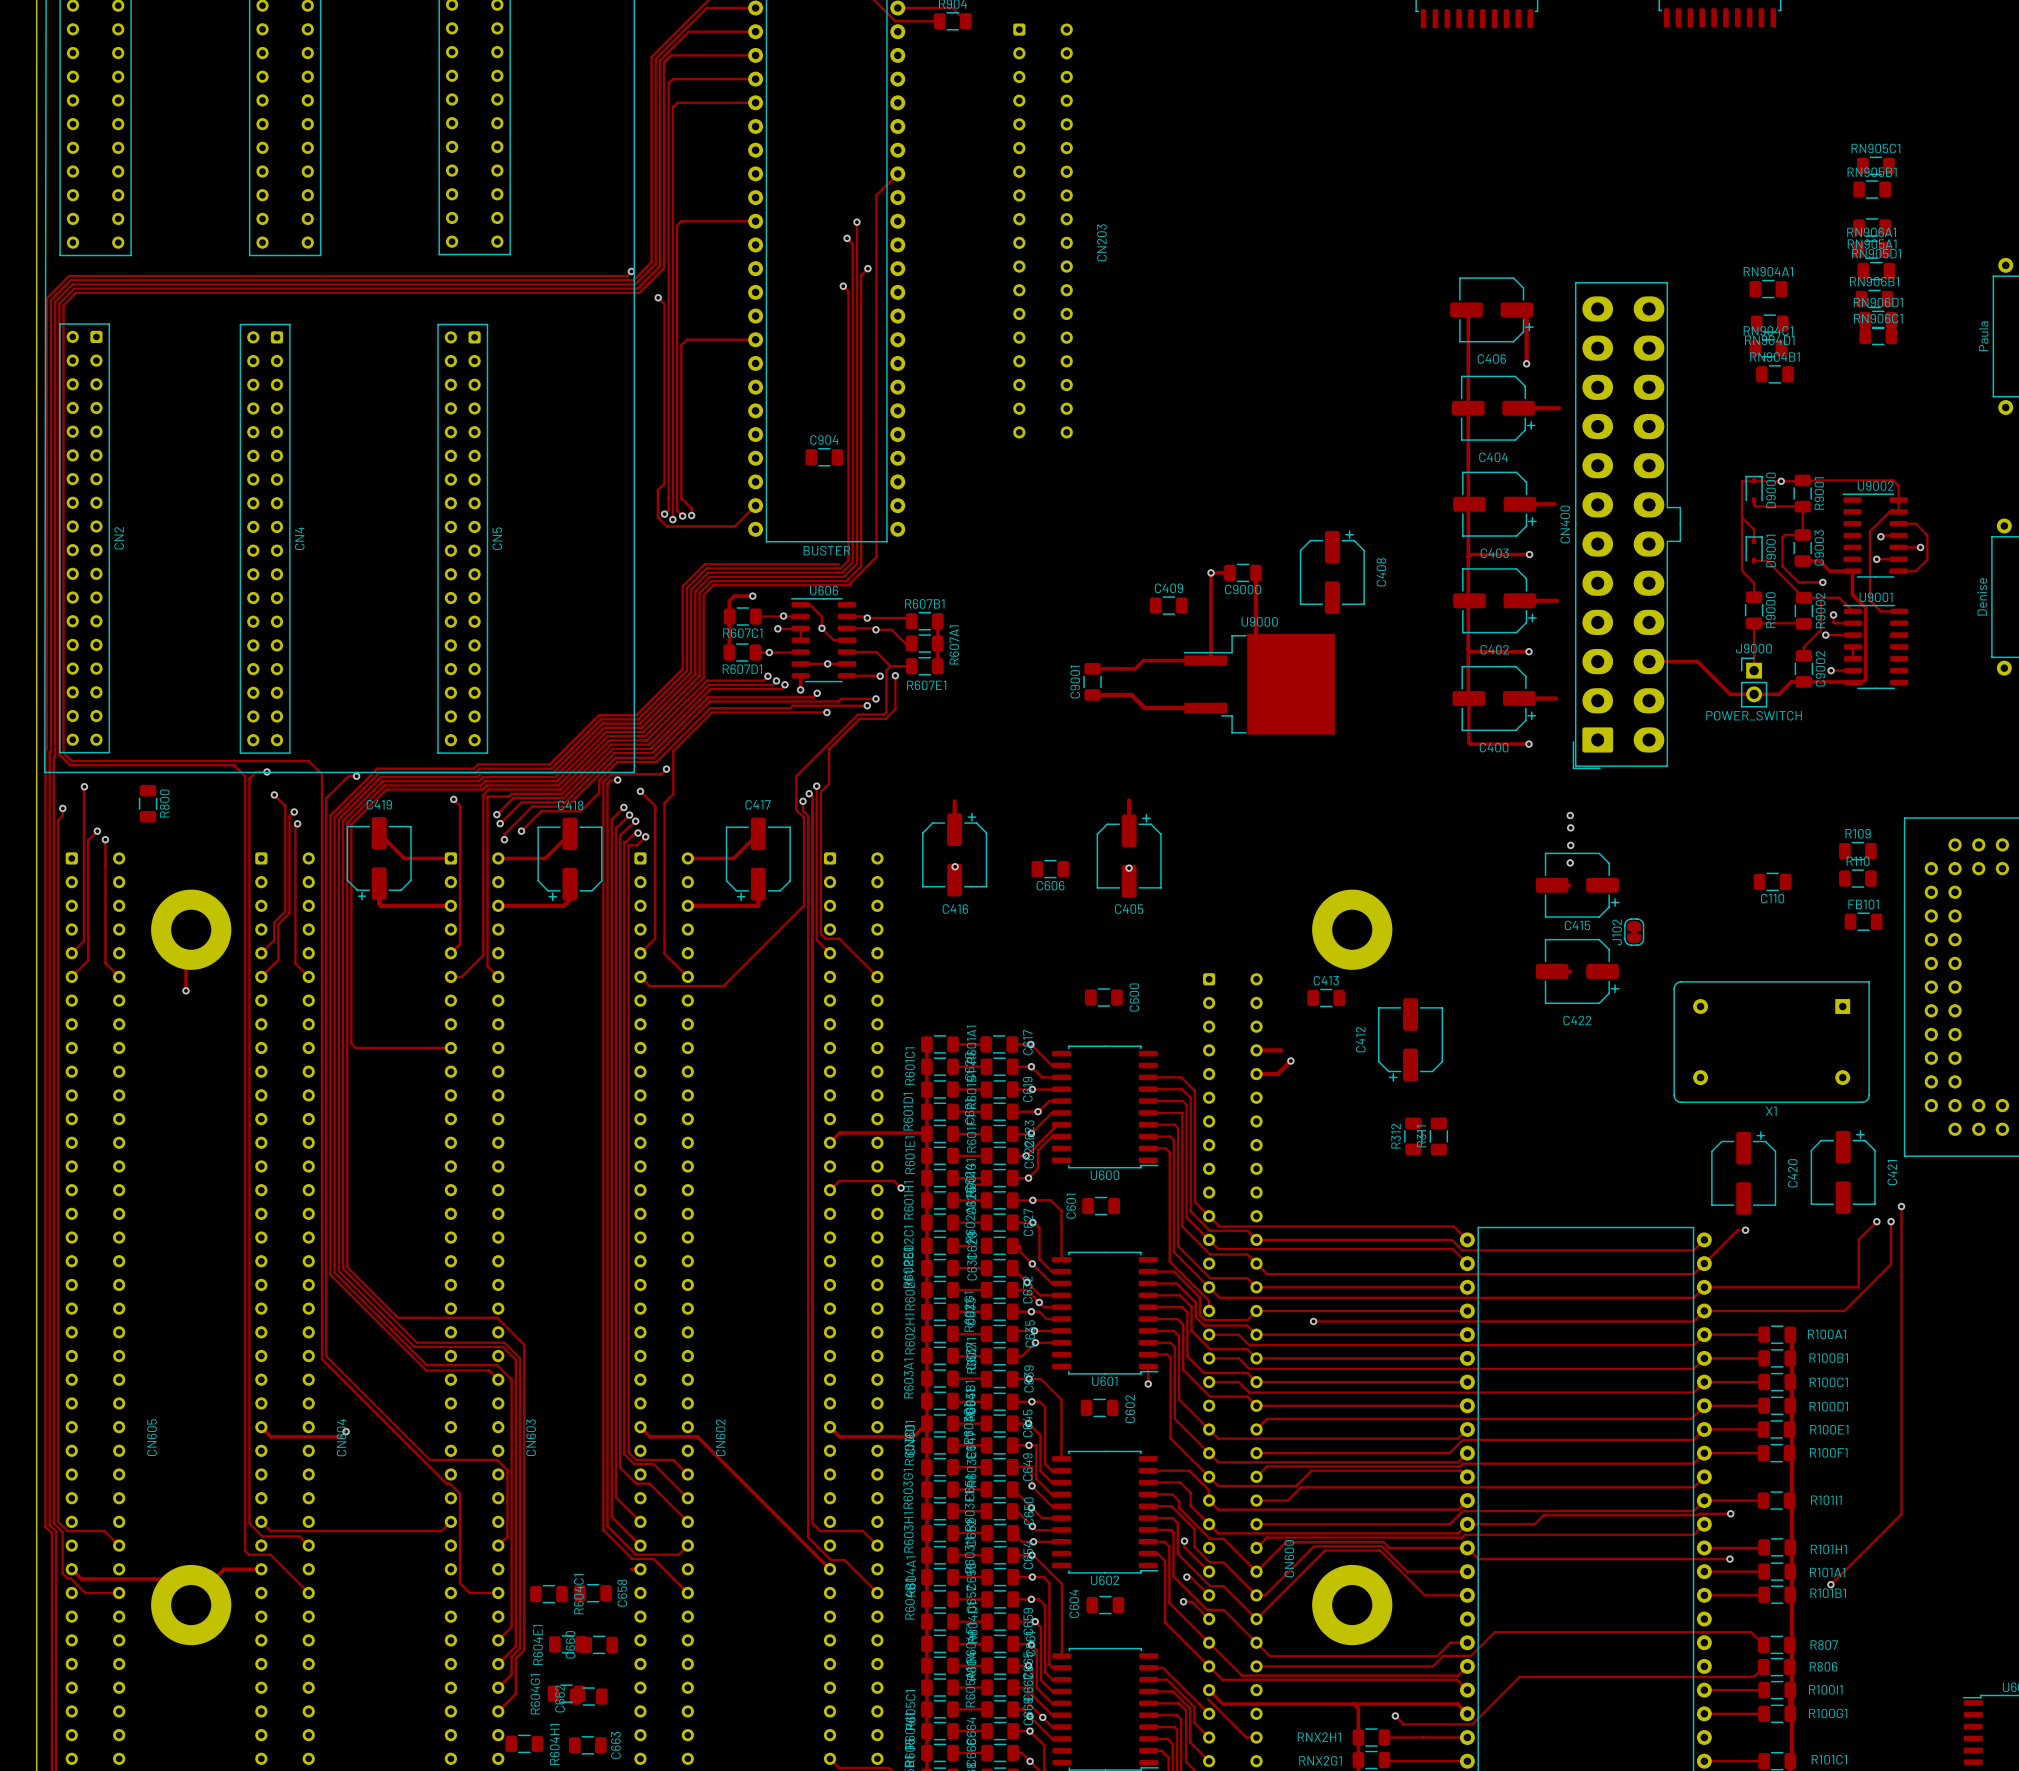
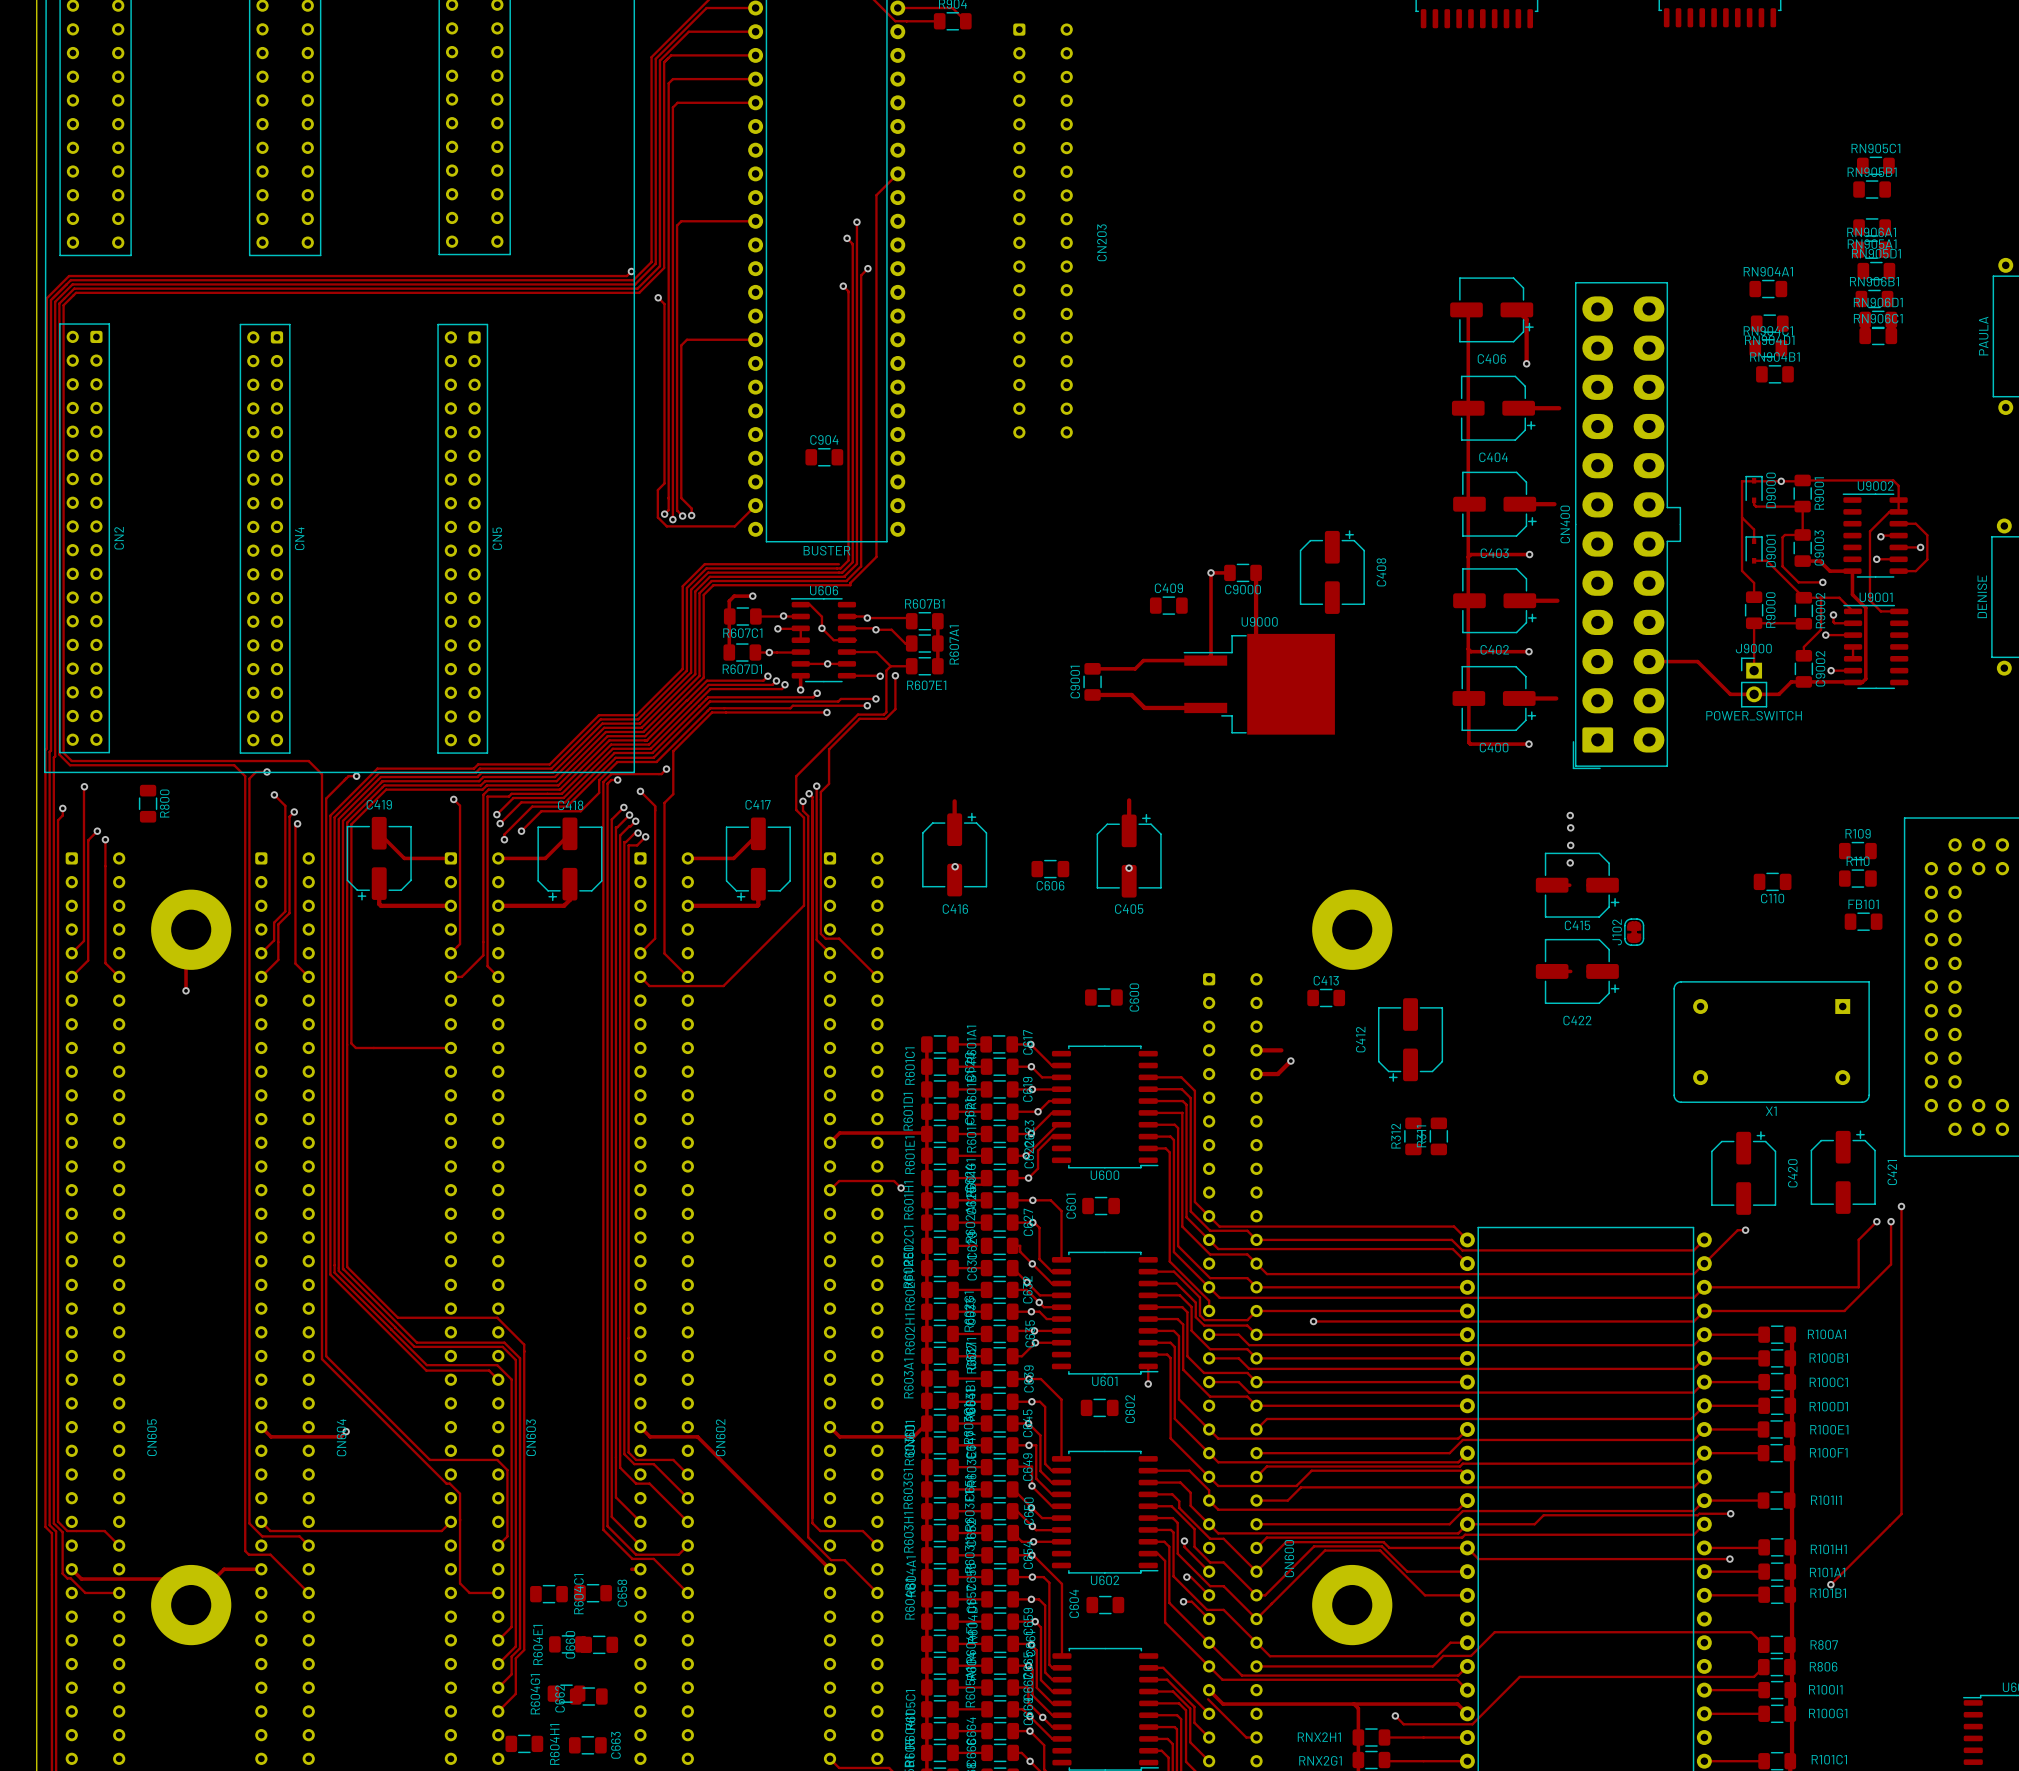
part value: Paula (1983, 336) -> PAULA (1983, 336)
part value: Denise (1982, 596) -> DENISE (1982, 596)

